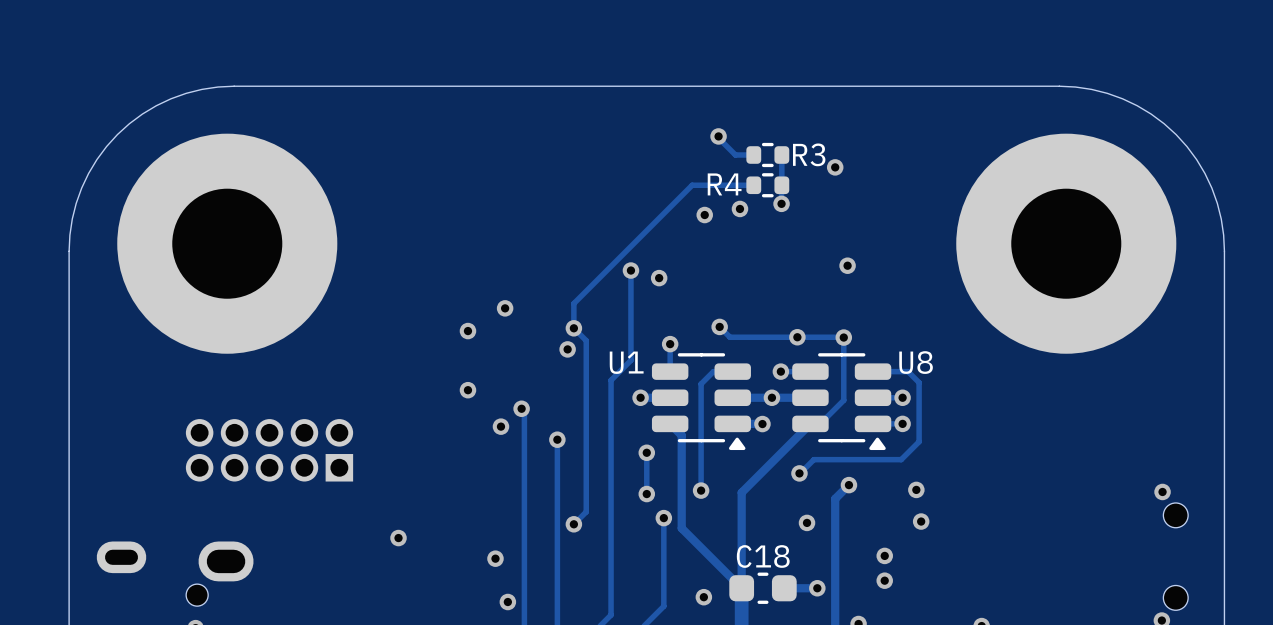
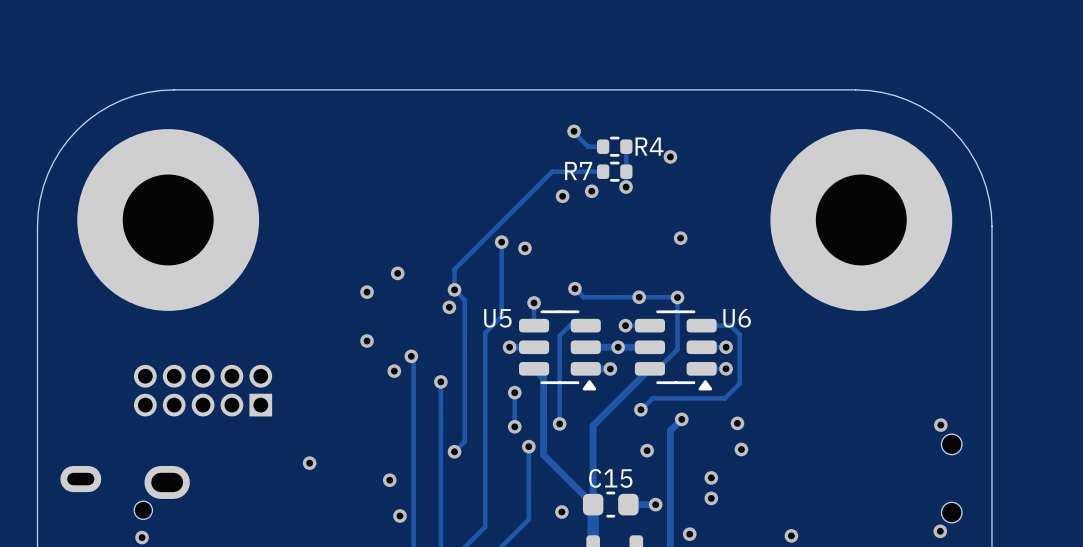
R3 name: R3 (809, 154) -> R4 (649, 146)
R4 name: R4 (724, 184) -> R7 (578, 171)
U1 name: U1 (626, 362) -> U5 (497, 318)
U8 name: U8 (916, 362) -> U6 (737, 318)
C18 name: C18 (763, 556) -> C15 (610, 478)

